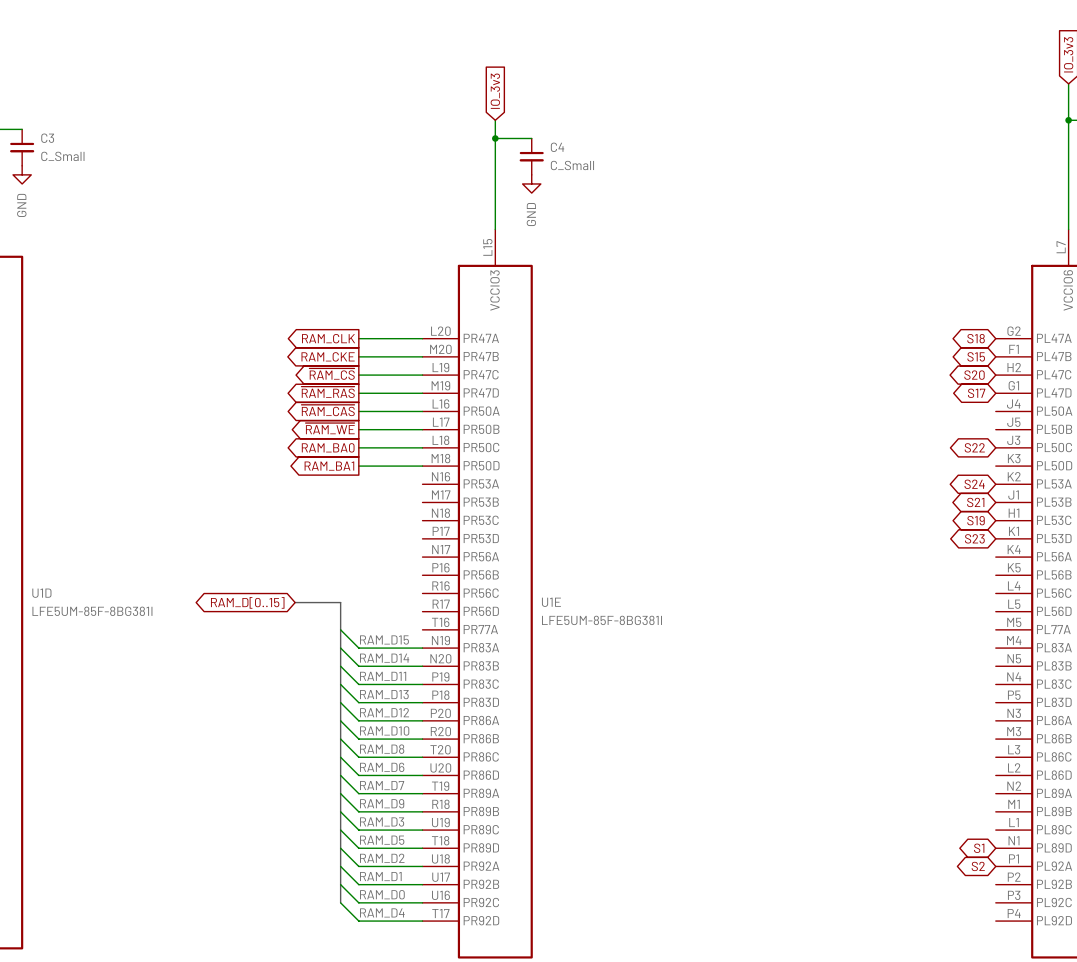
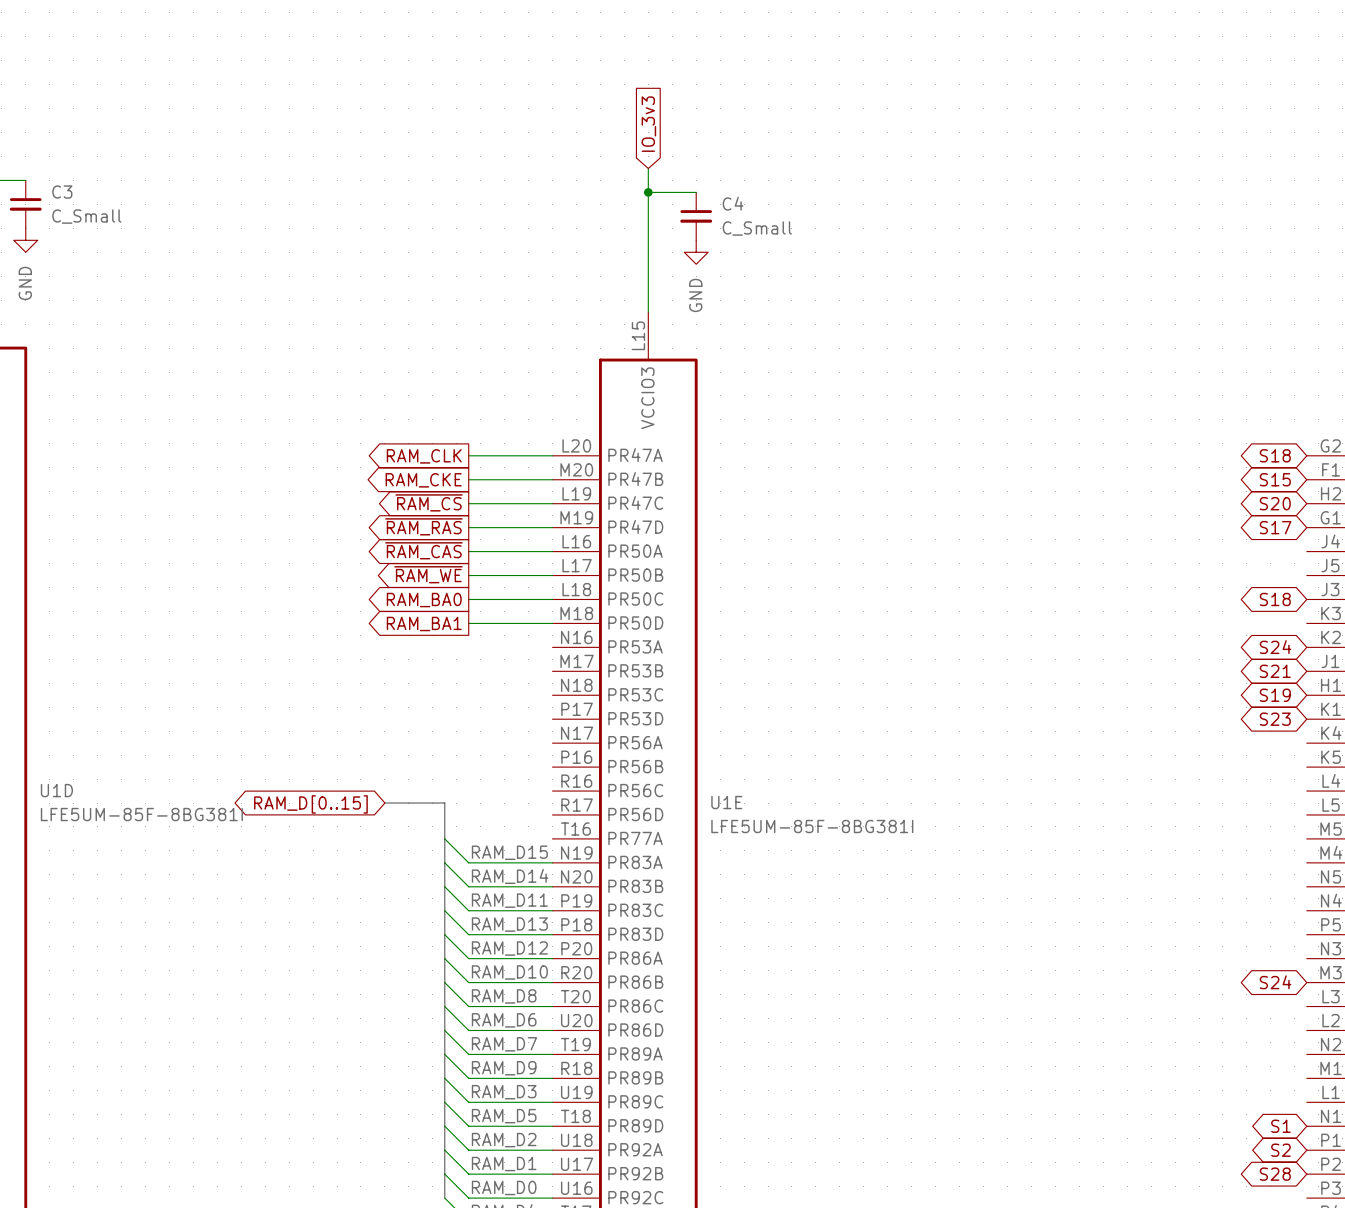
global label: S22 (974, 447) -> S18 (1275, 599)
global label: none -> S24 (1275, 982)
global label: none -> S28 (1275, 1174)

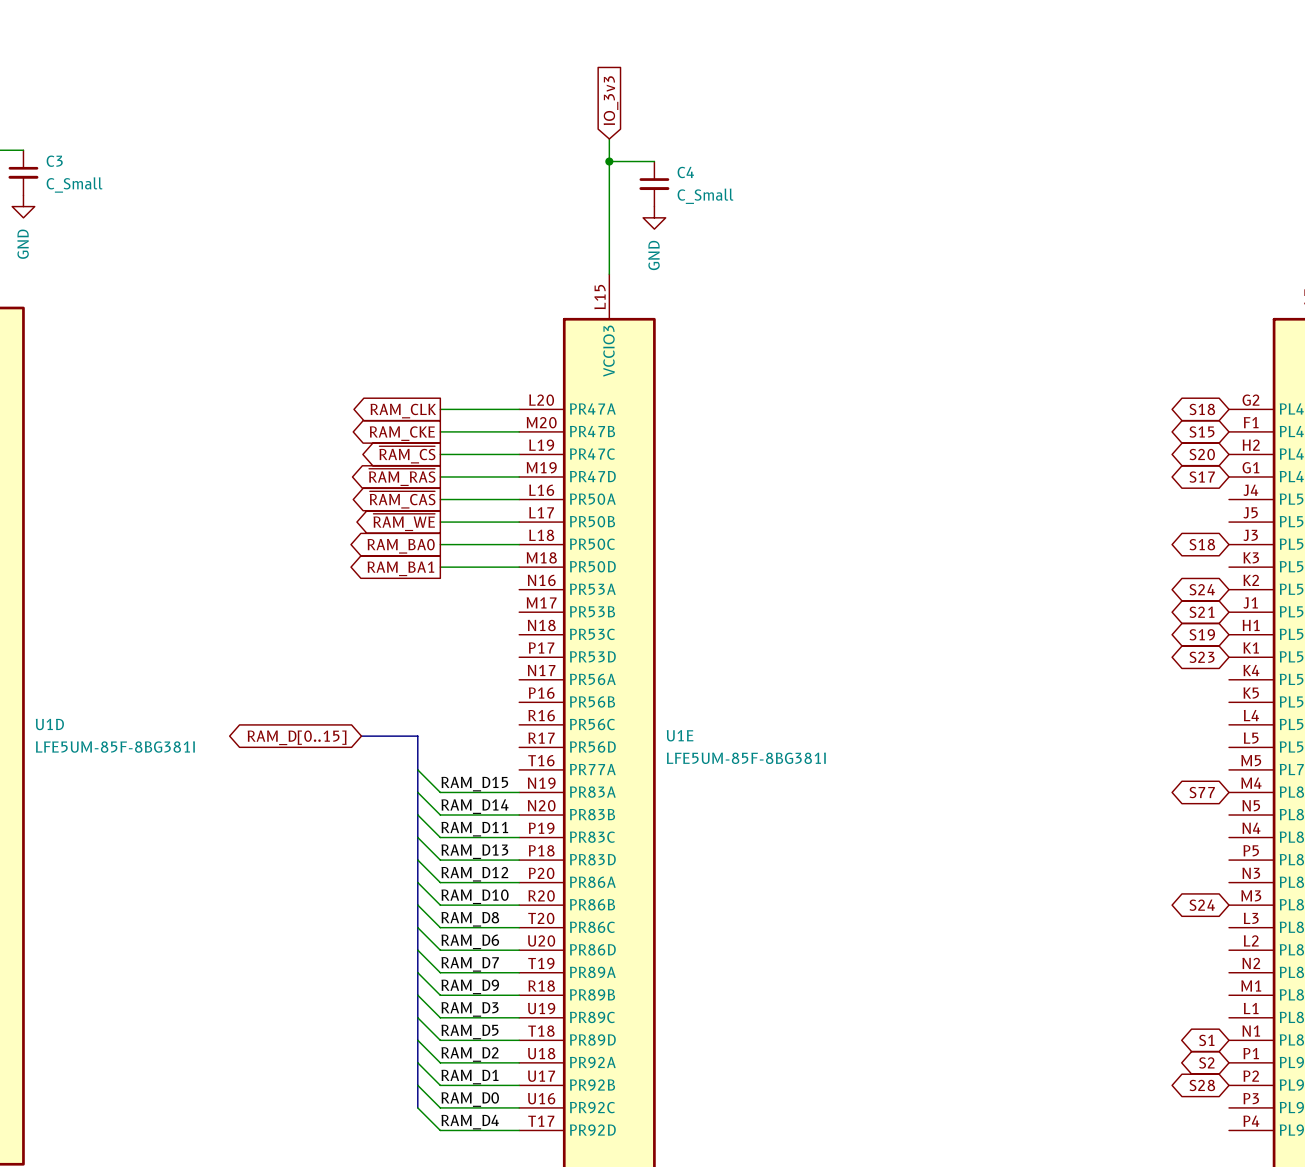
global label: none -> S77 (1202, 792)

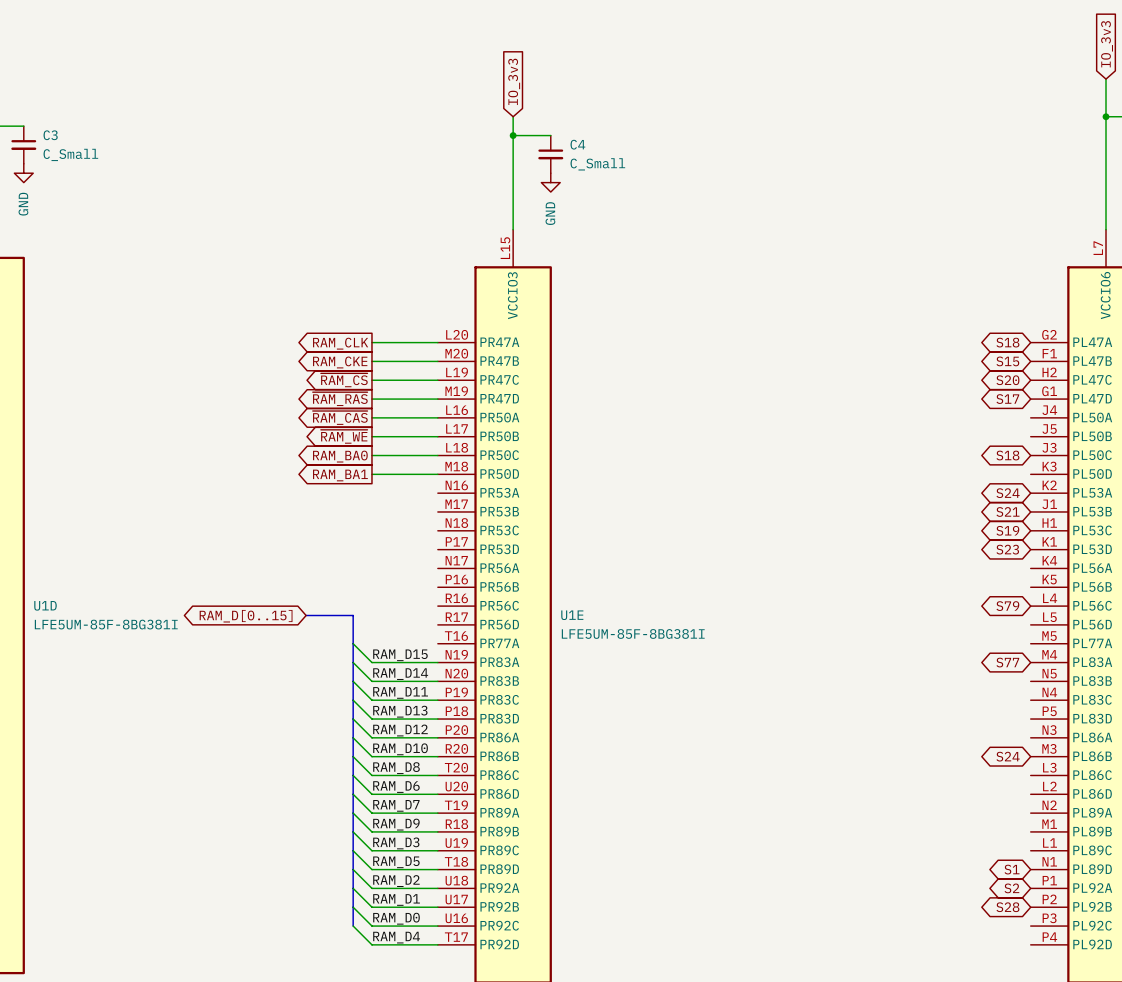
global label: none -> S79 (1007, 606)

